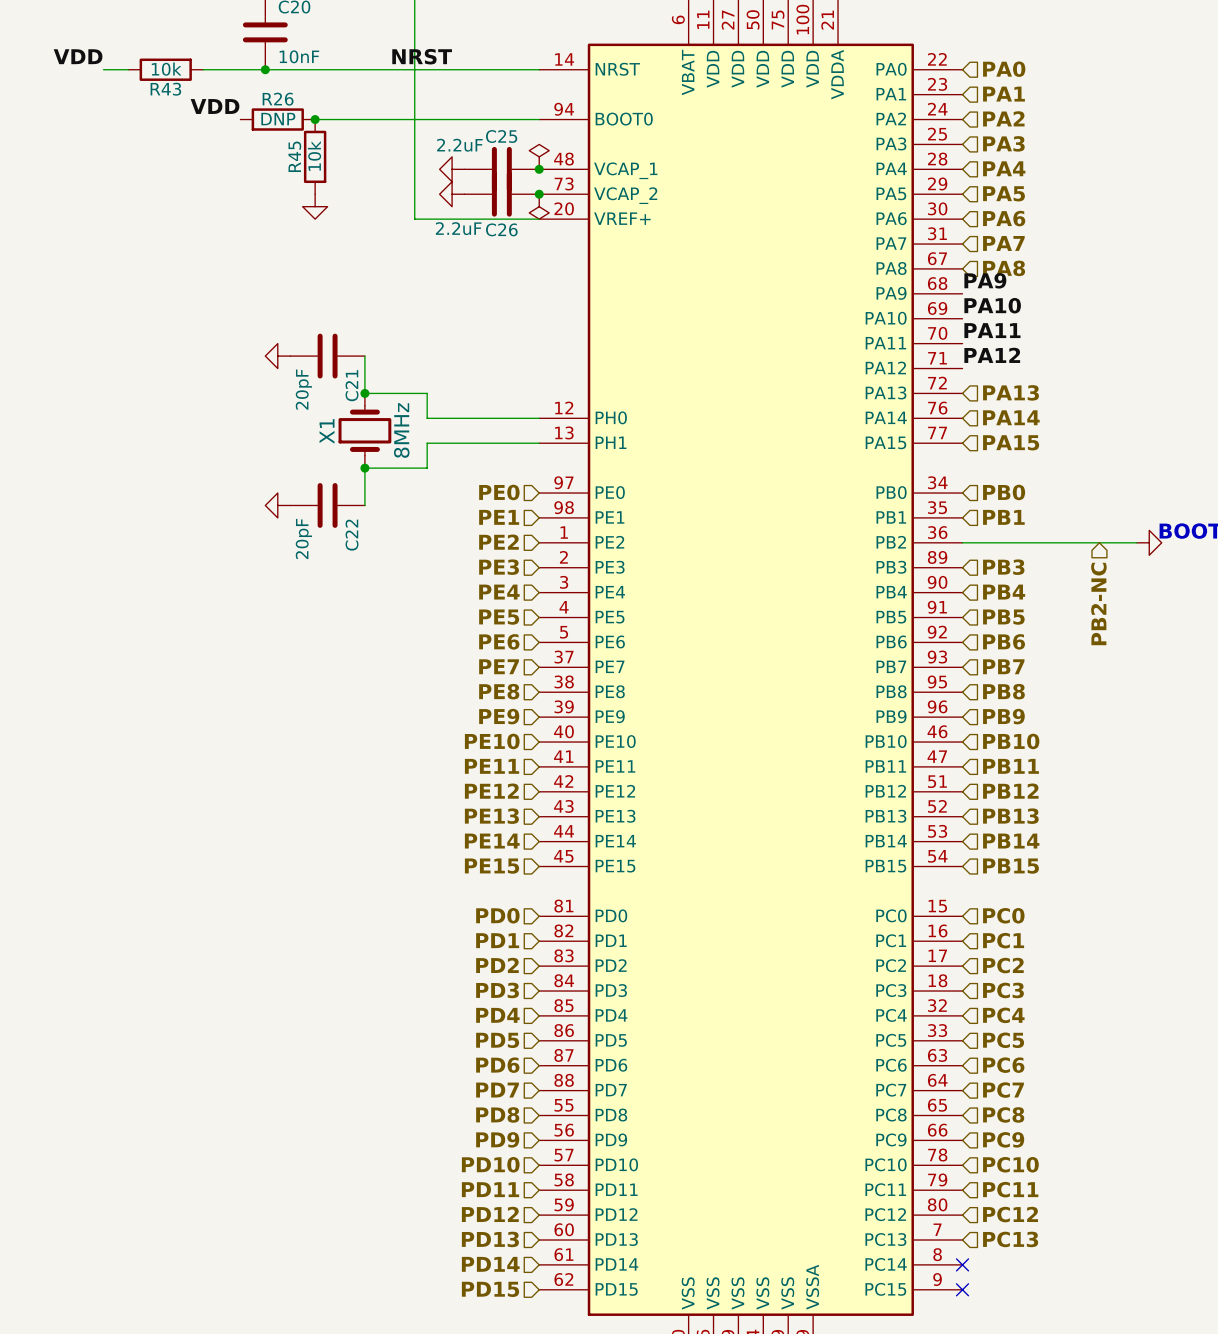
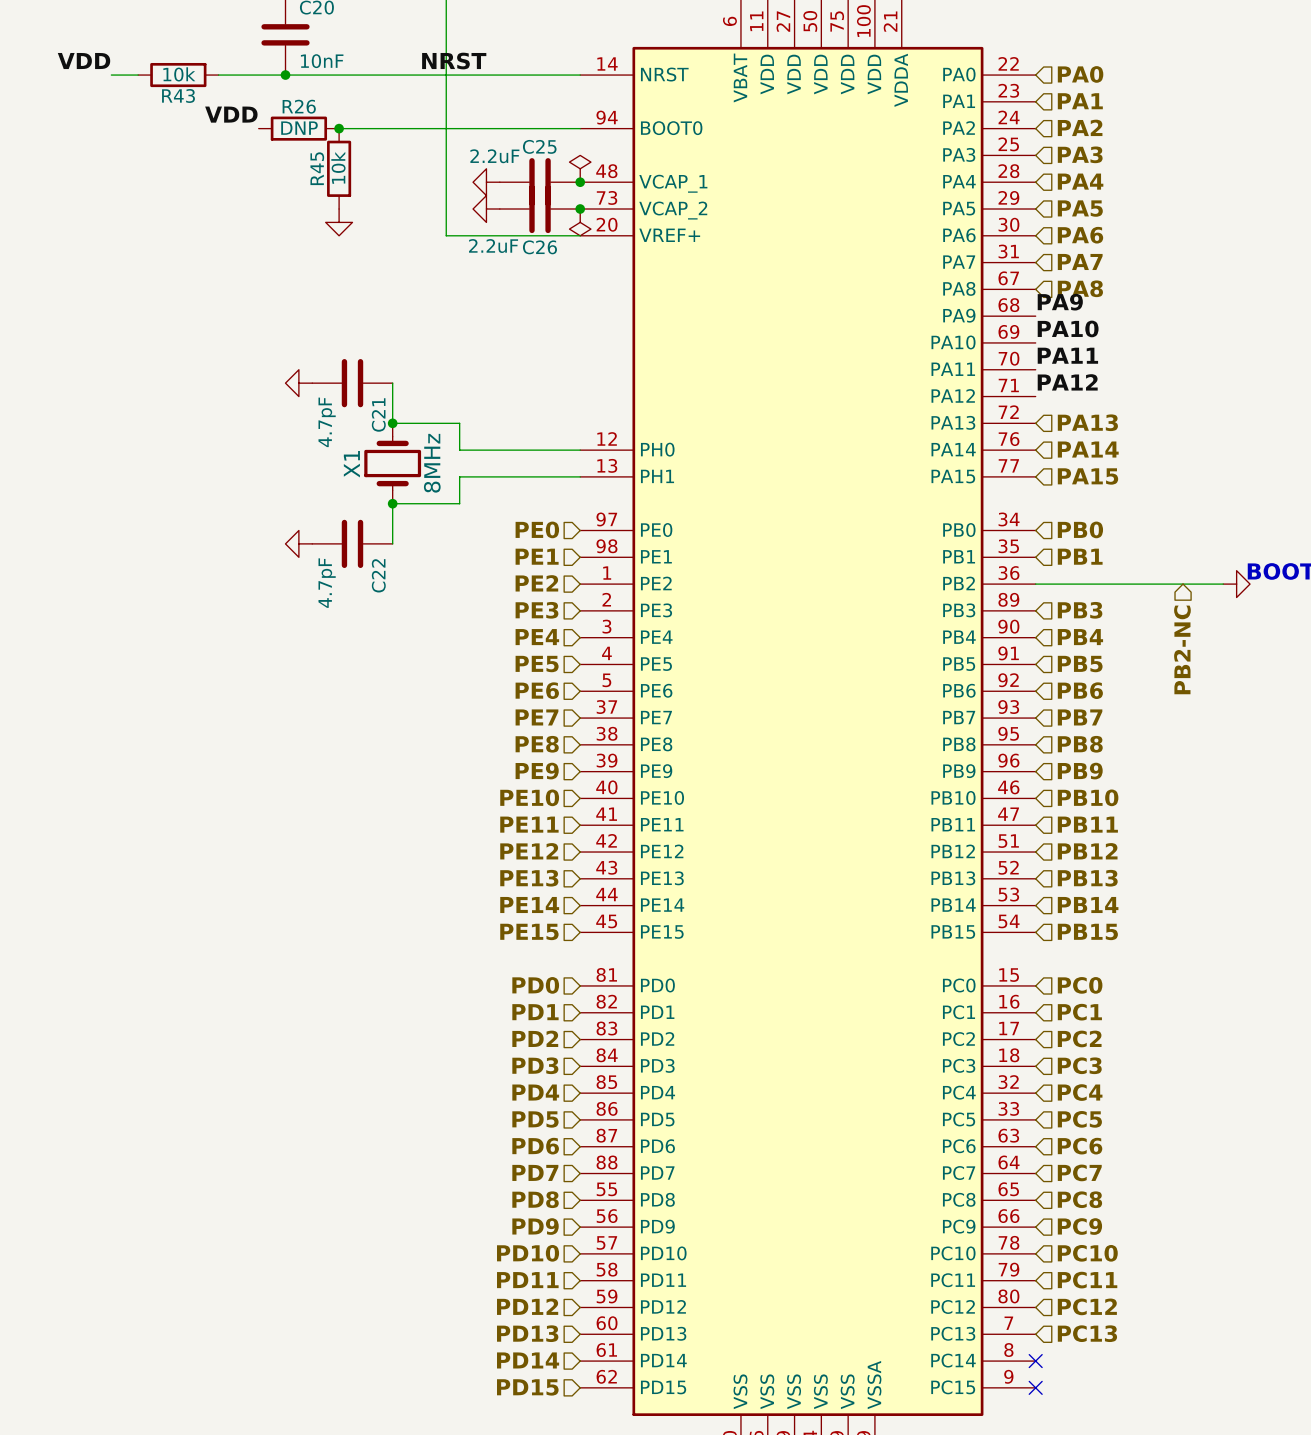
C21 value: 20pF (303, 389) -> 4.7pF (327, 422)
C22 value: 20pF (303, 538) -> 4.7pF (327, 583)

